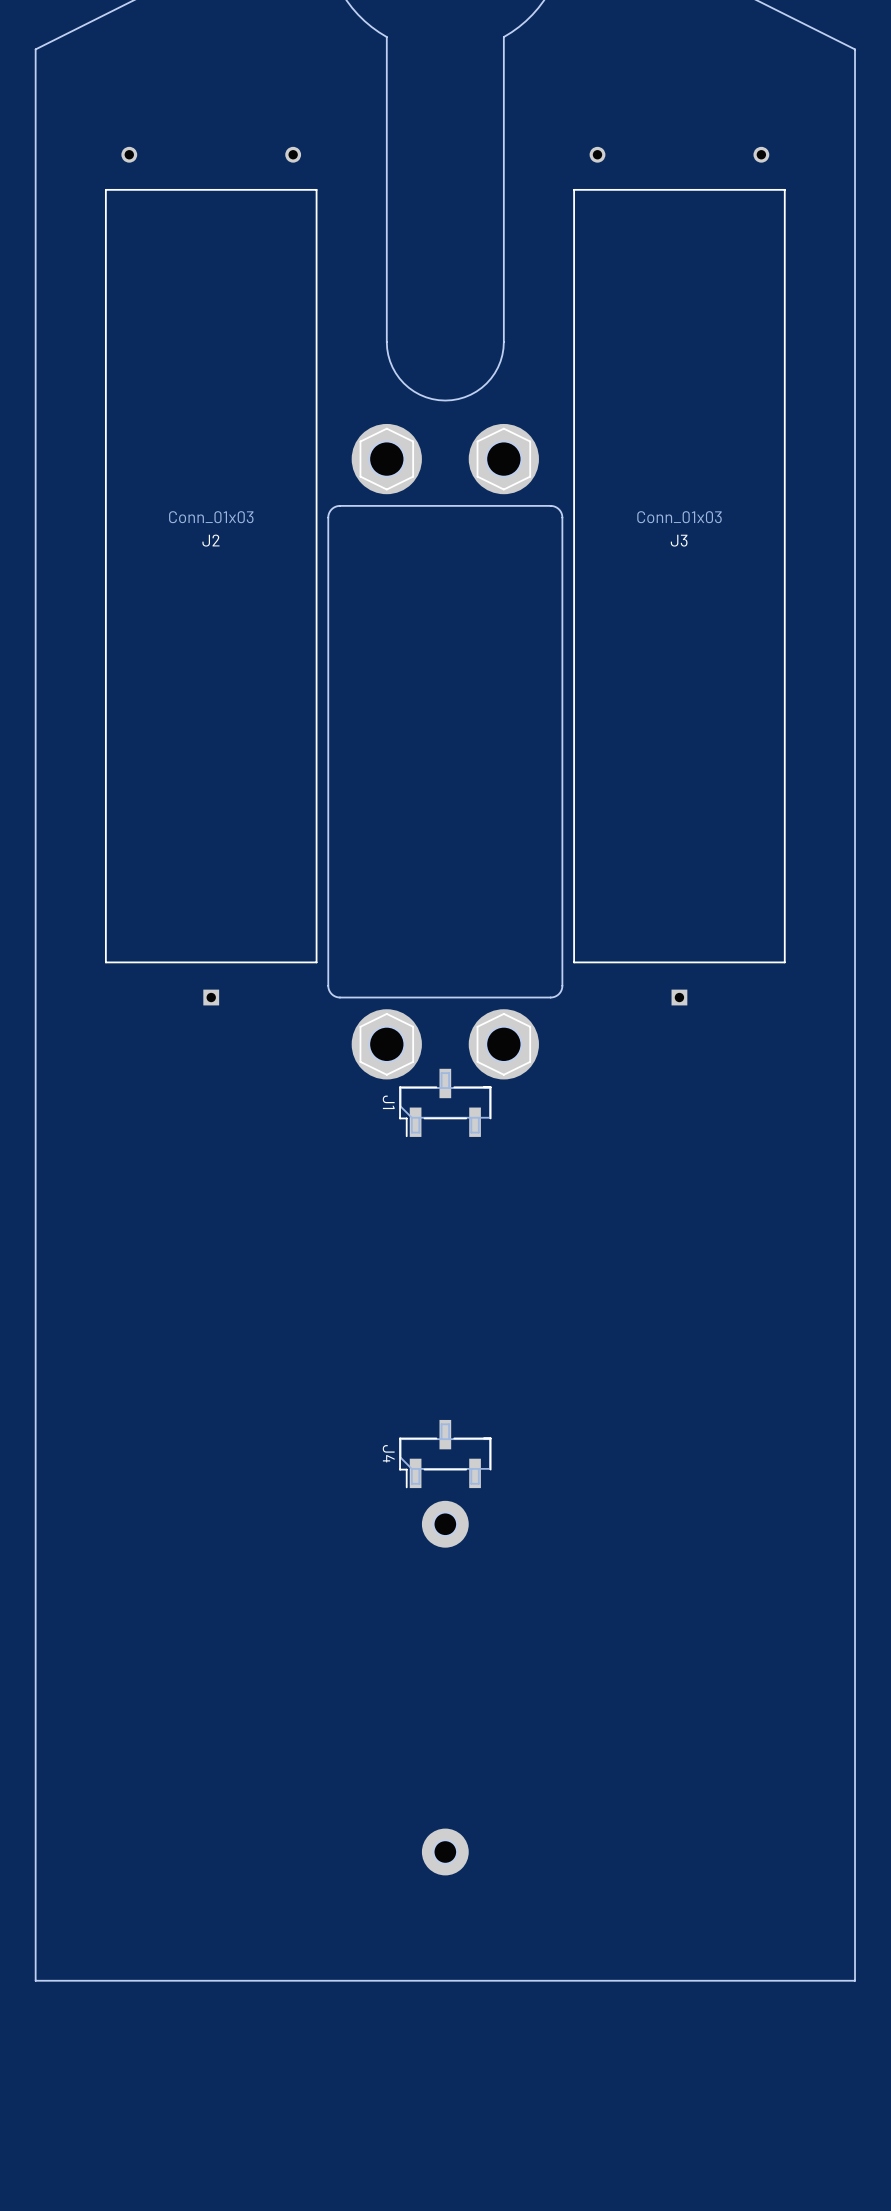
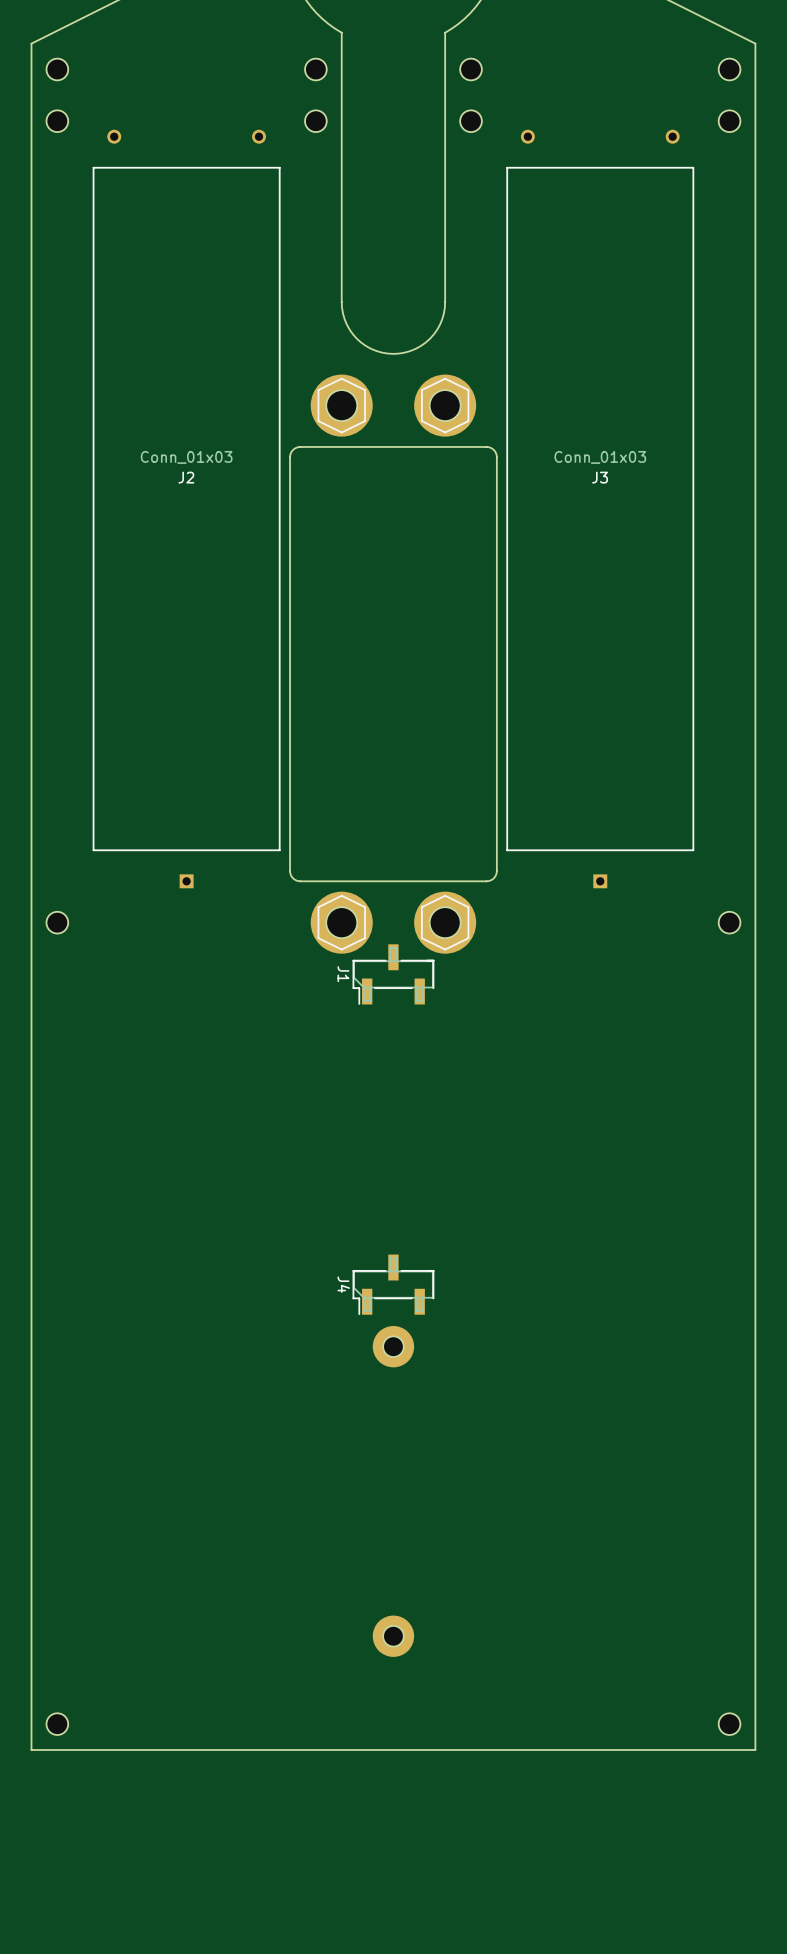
part: none -> (57, 69)
part: none -> (315, 69)
part: none -> (471, 69)
part: none -> (729, 69)
part: none -> (57, 121)
part: none -> (315, 121)
part: none -> (471, 121)
part: none -> (729, 121)
part: none -> (57, 922)
part: none -> (729, 922)
part: none -> (57, 1724)
part: none -> (729, 1724)

